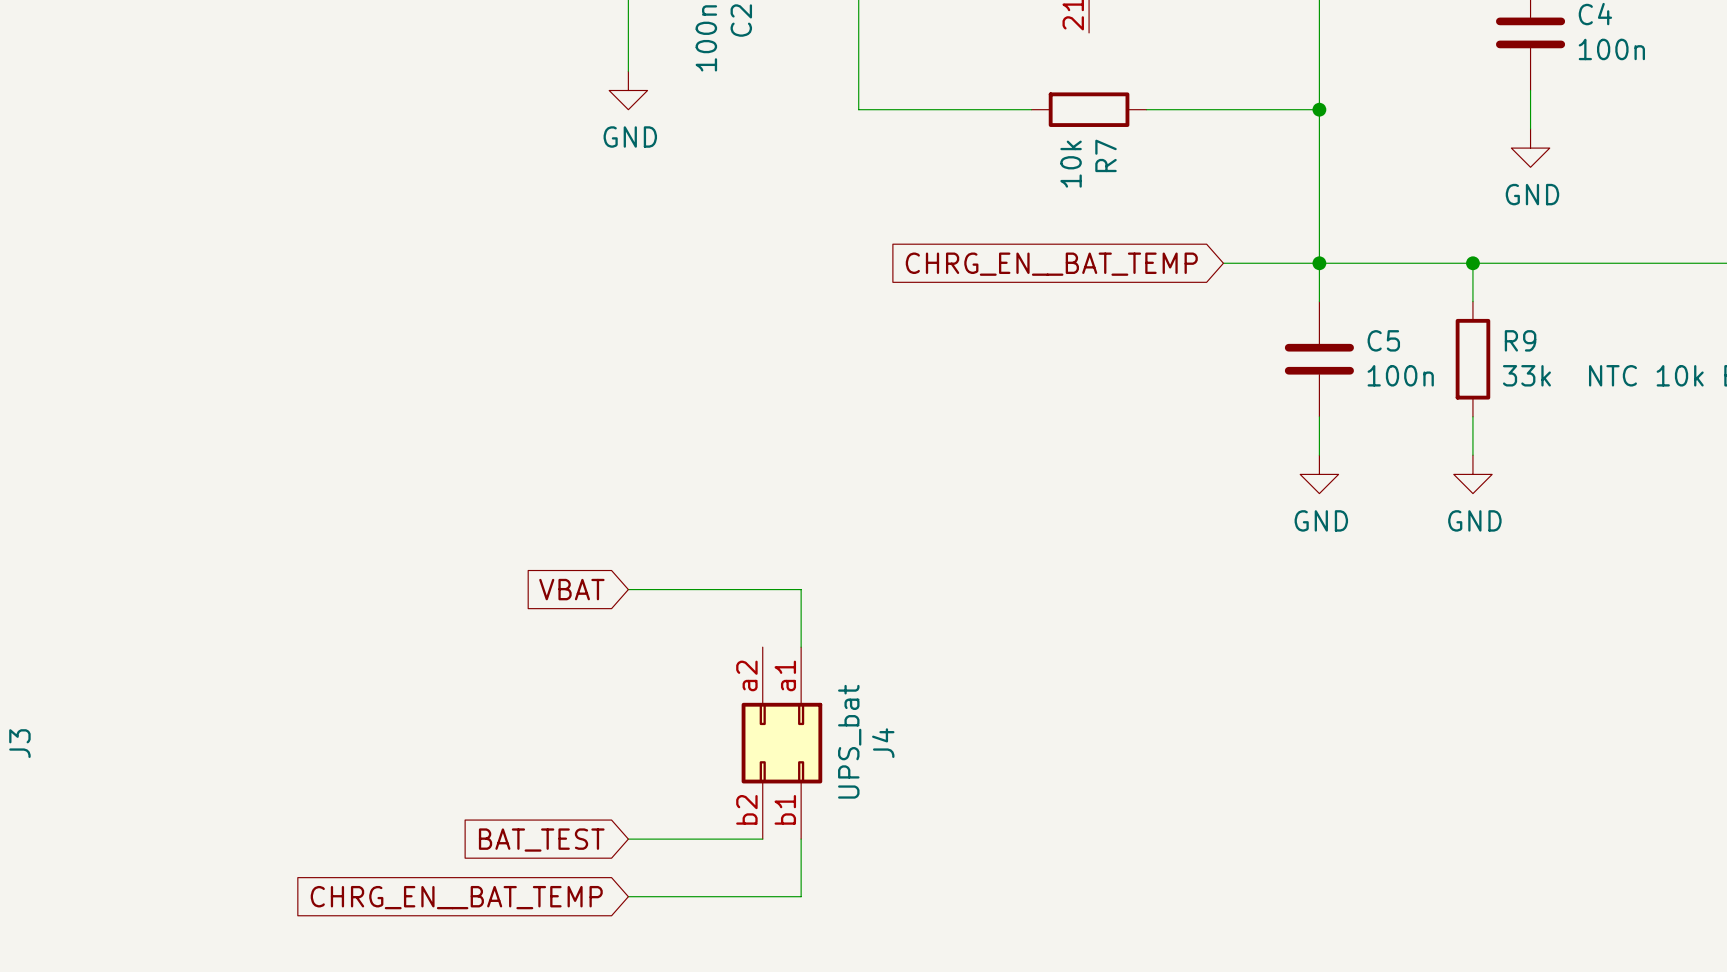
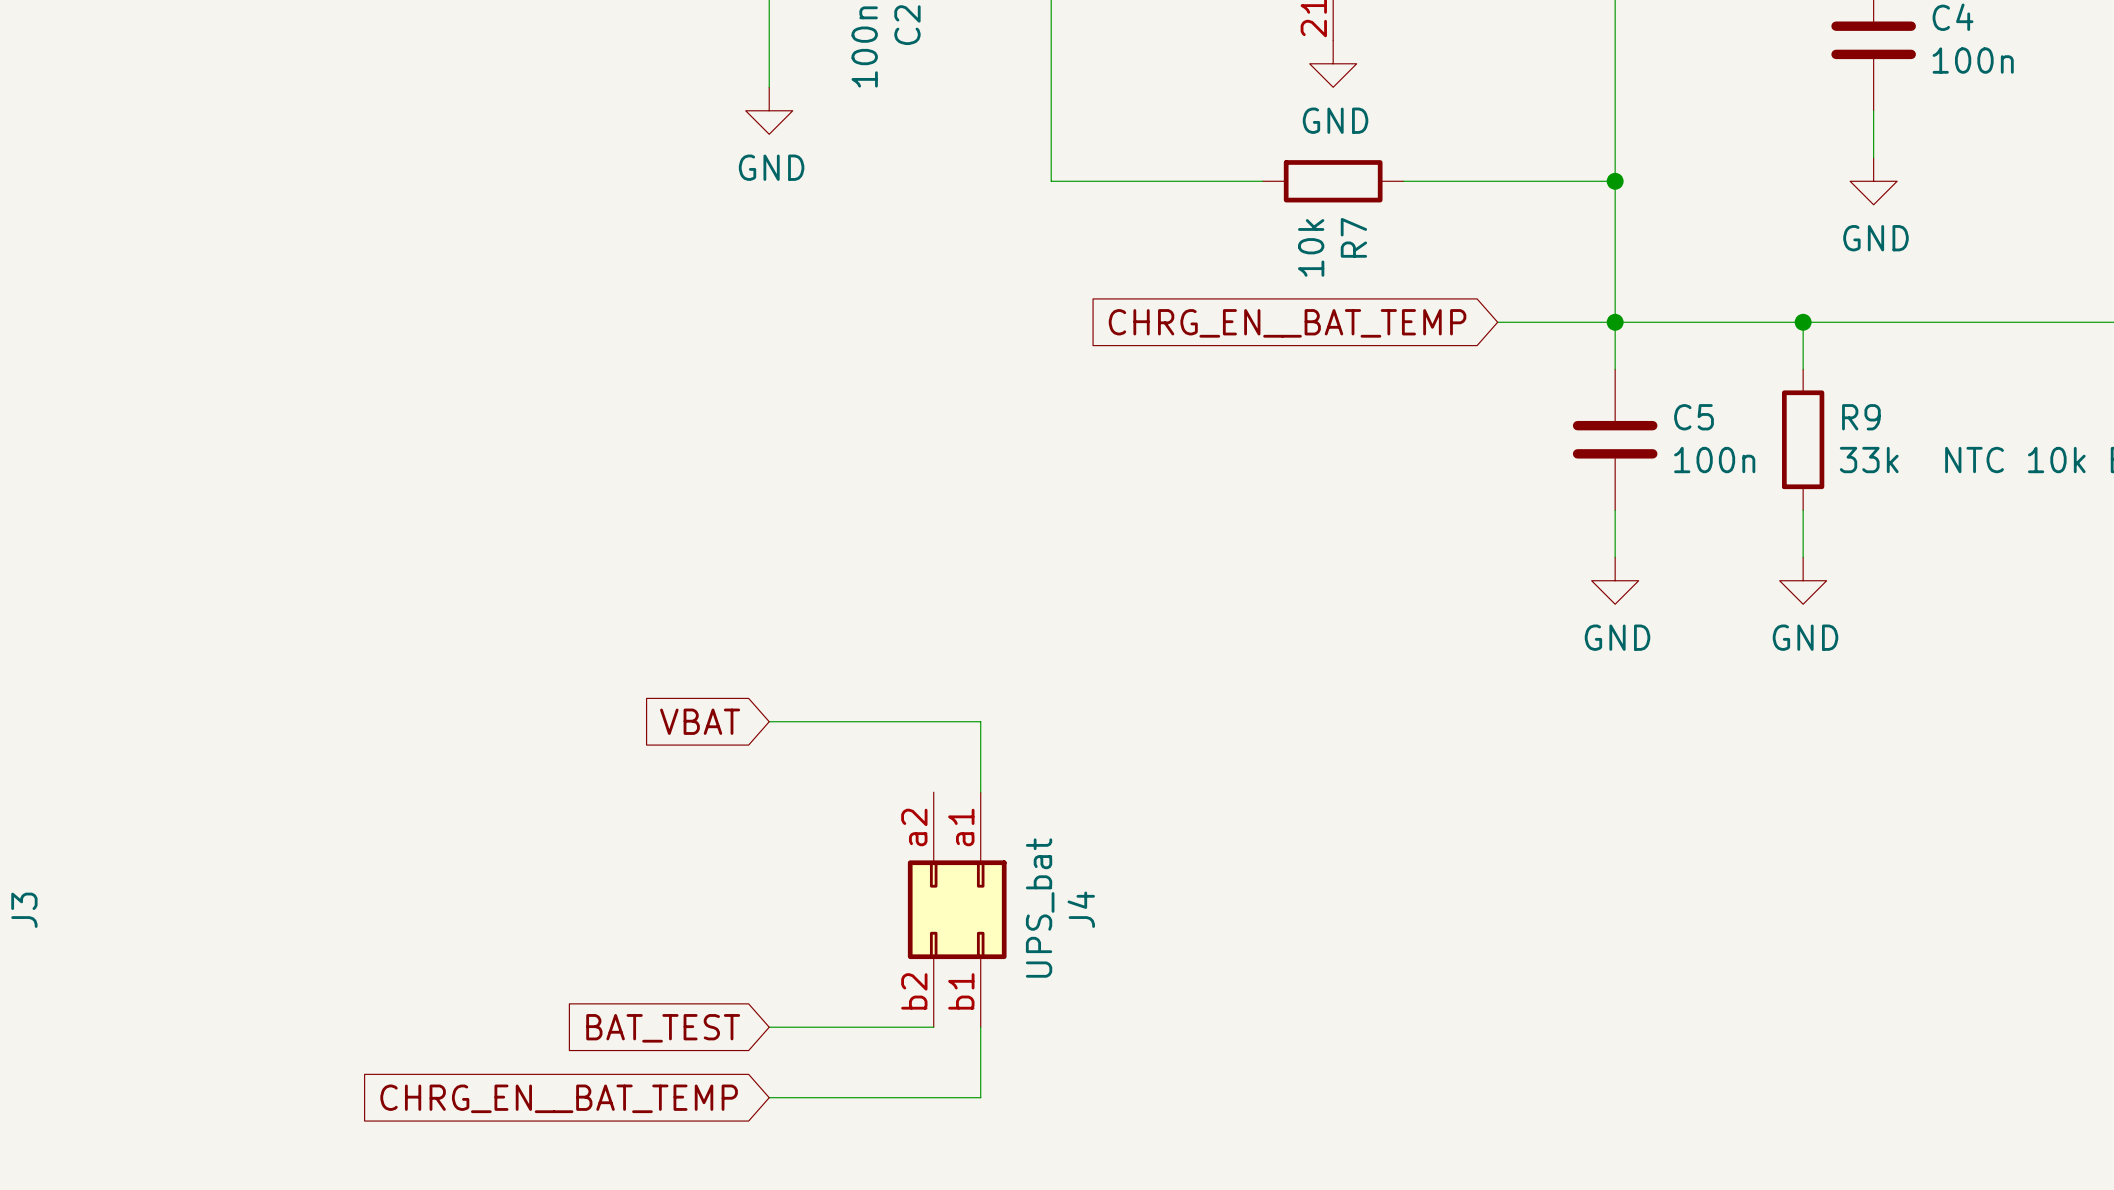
power symbol: none -> GND (1333, 63)
wire: (858, 109) (1031, 109) -> (1051, 134) (1051, 181) (1262, 181)
R7 position: (1089, 109) -> (1333, 181)
wire: (1146, 109) (1319, 109) -> (1403, 181) (1615, 181)
junction position: (1319, 109) -> (1615, 181)

